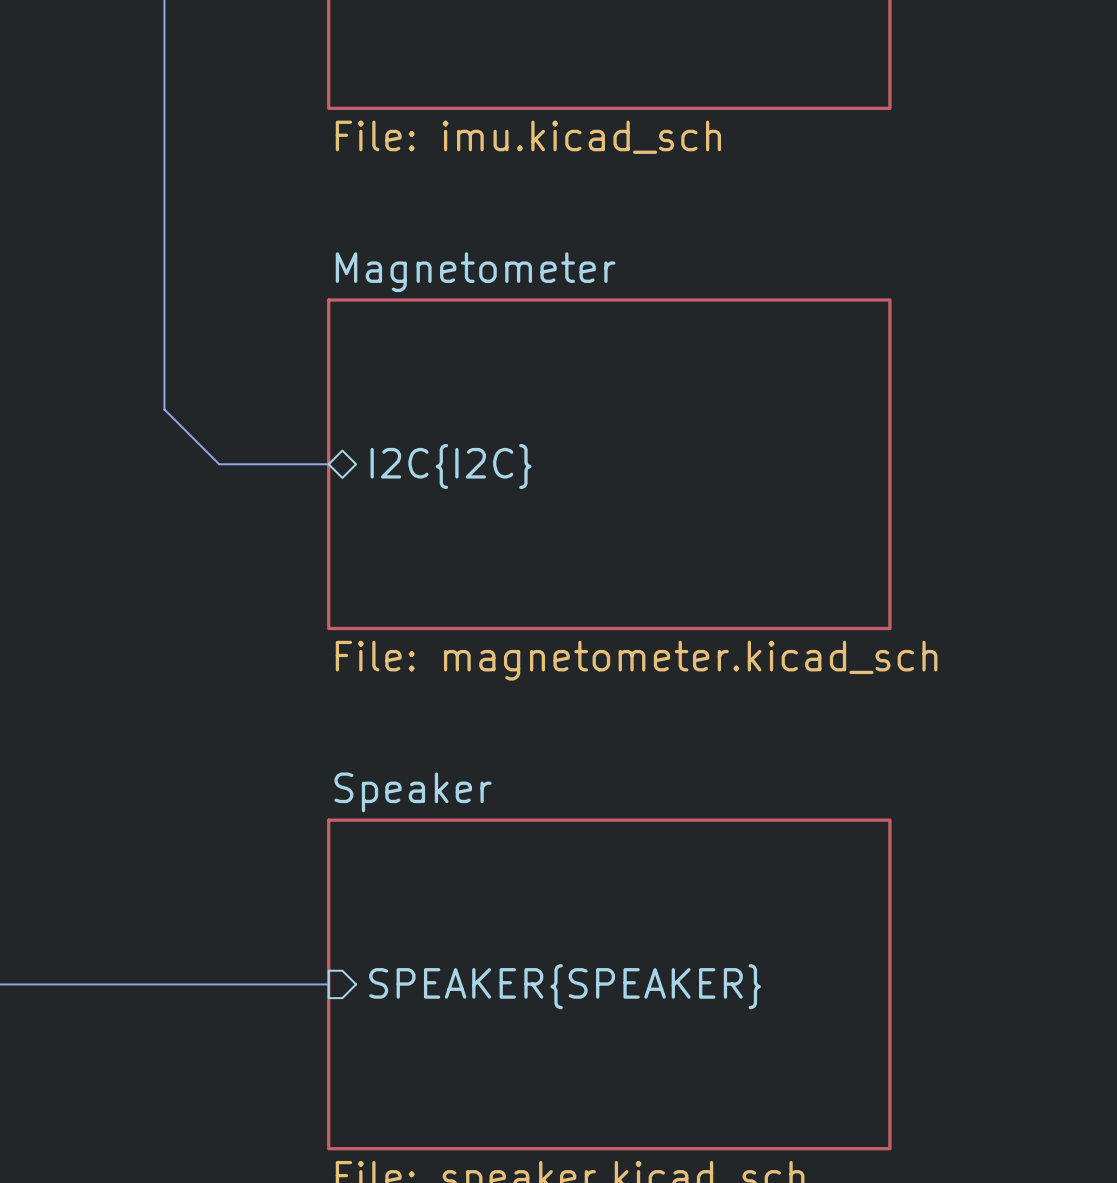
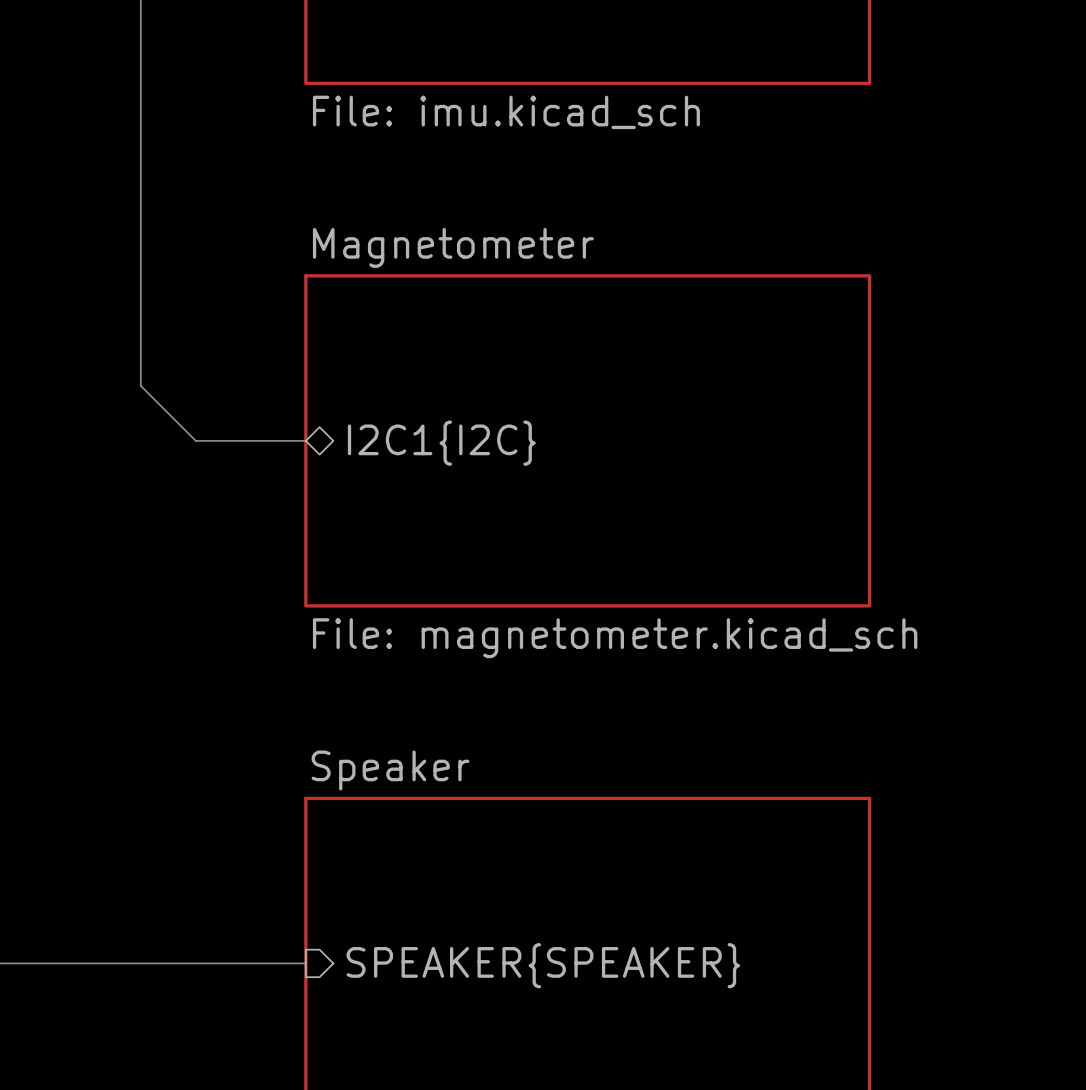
sheet pin: I2C{I2C} (451, 466) -> I2C1{I2C} (441, 443)

